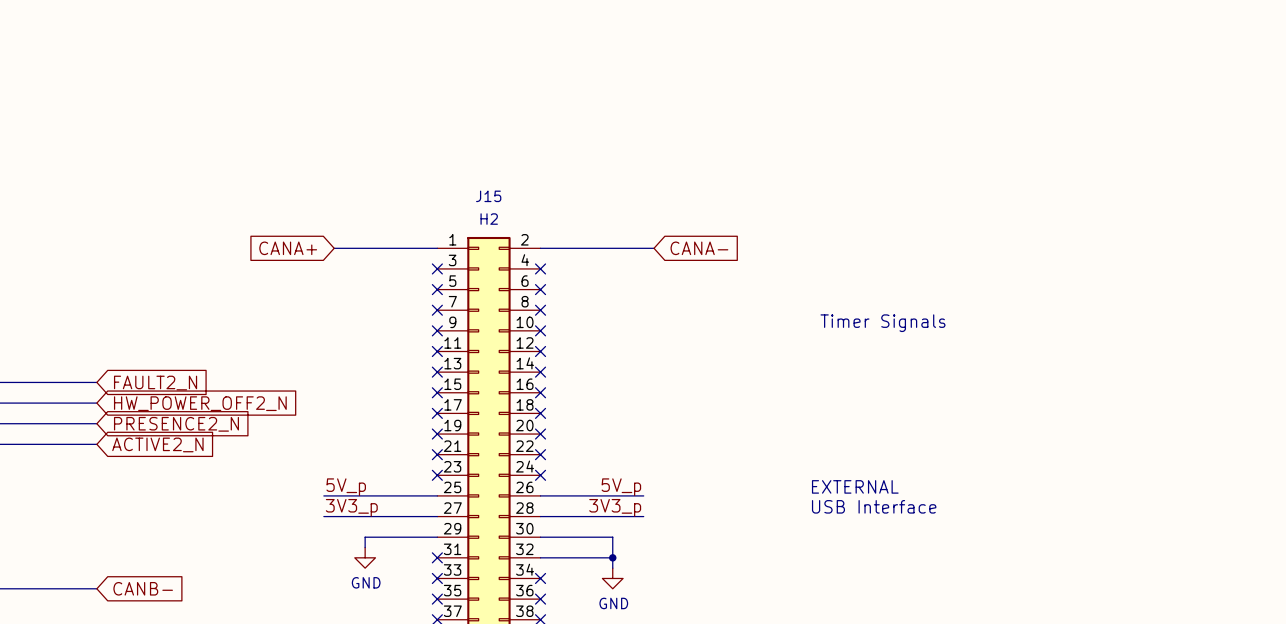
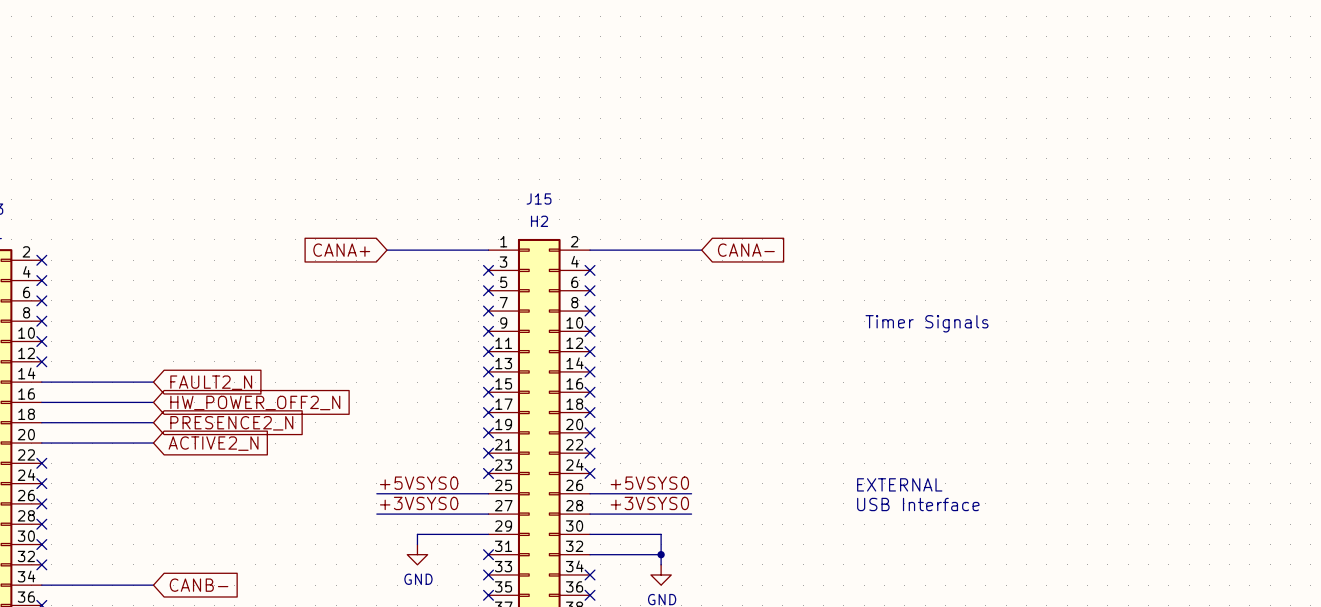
label: 5V_p (346, 487) -> +5VSYS0 (419, 483)
label: 5V_p (621, 487) -> +5VSYS0 (649, 483)
label: 3V3_p (351, 507) -> +3VSYS0 (419, 503)
label: 3V3_p (615, 507) -> +3VSYS0 (649, 503)

